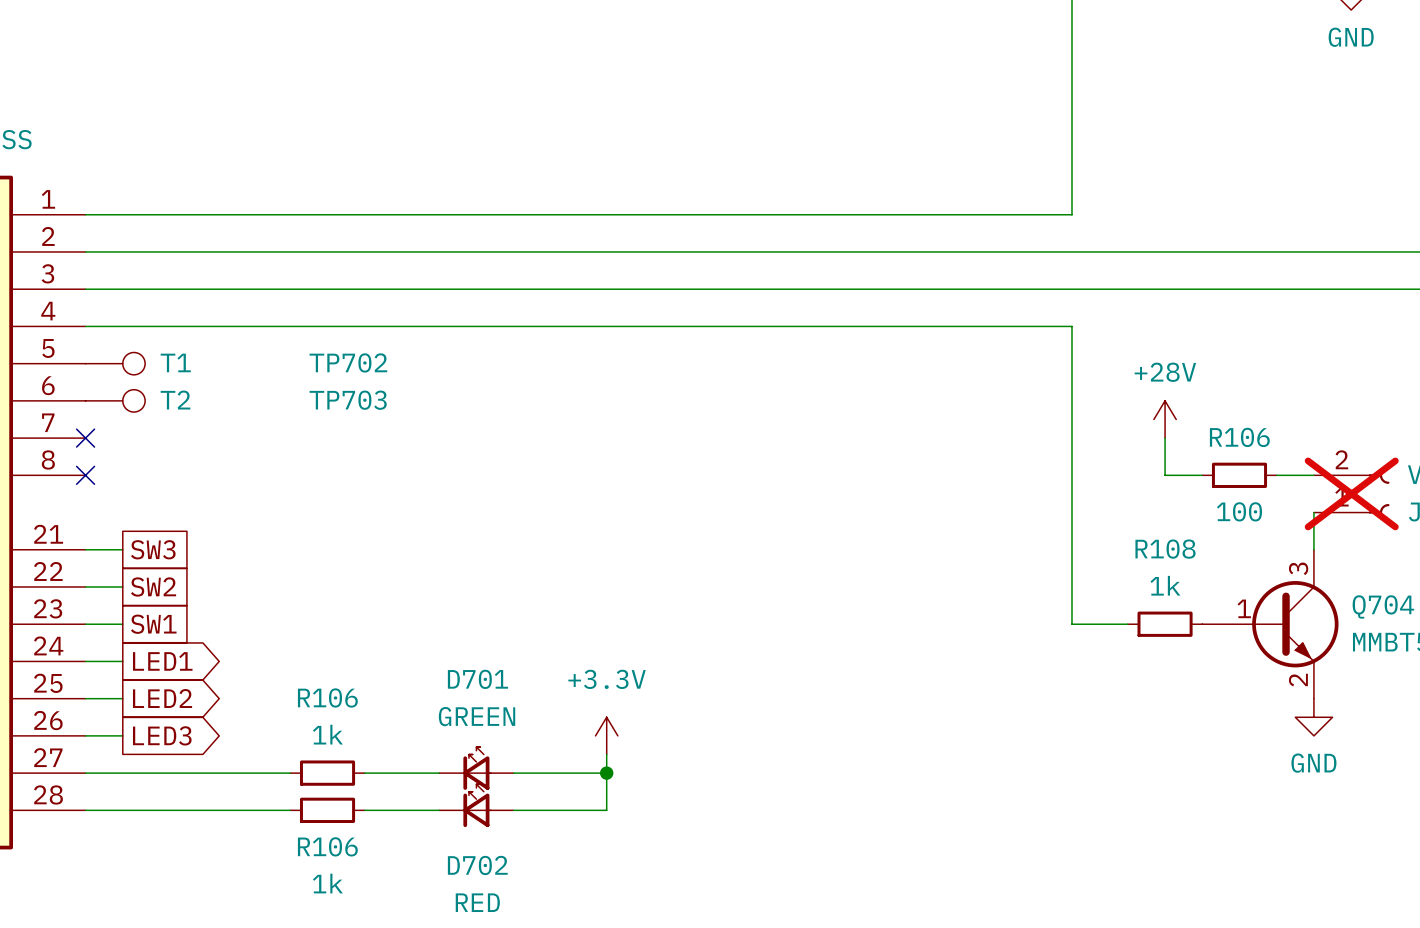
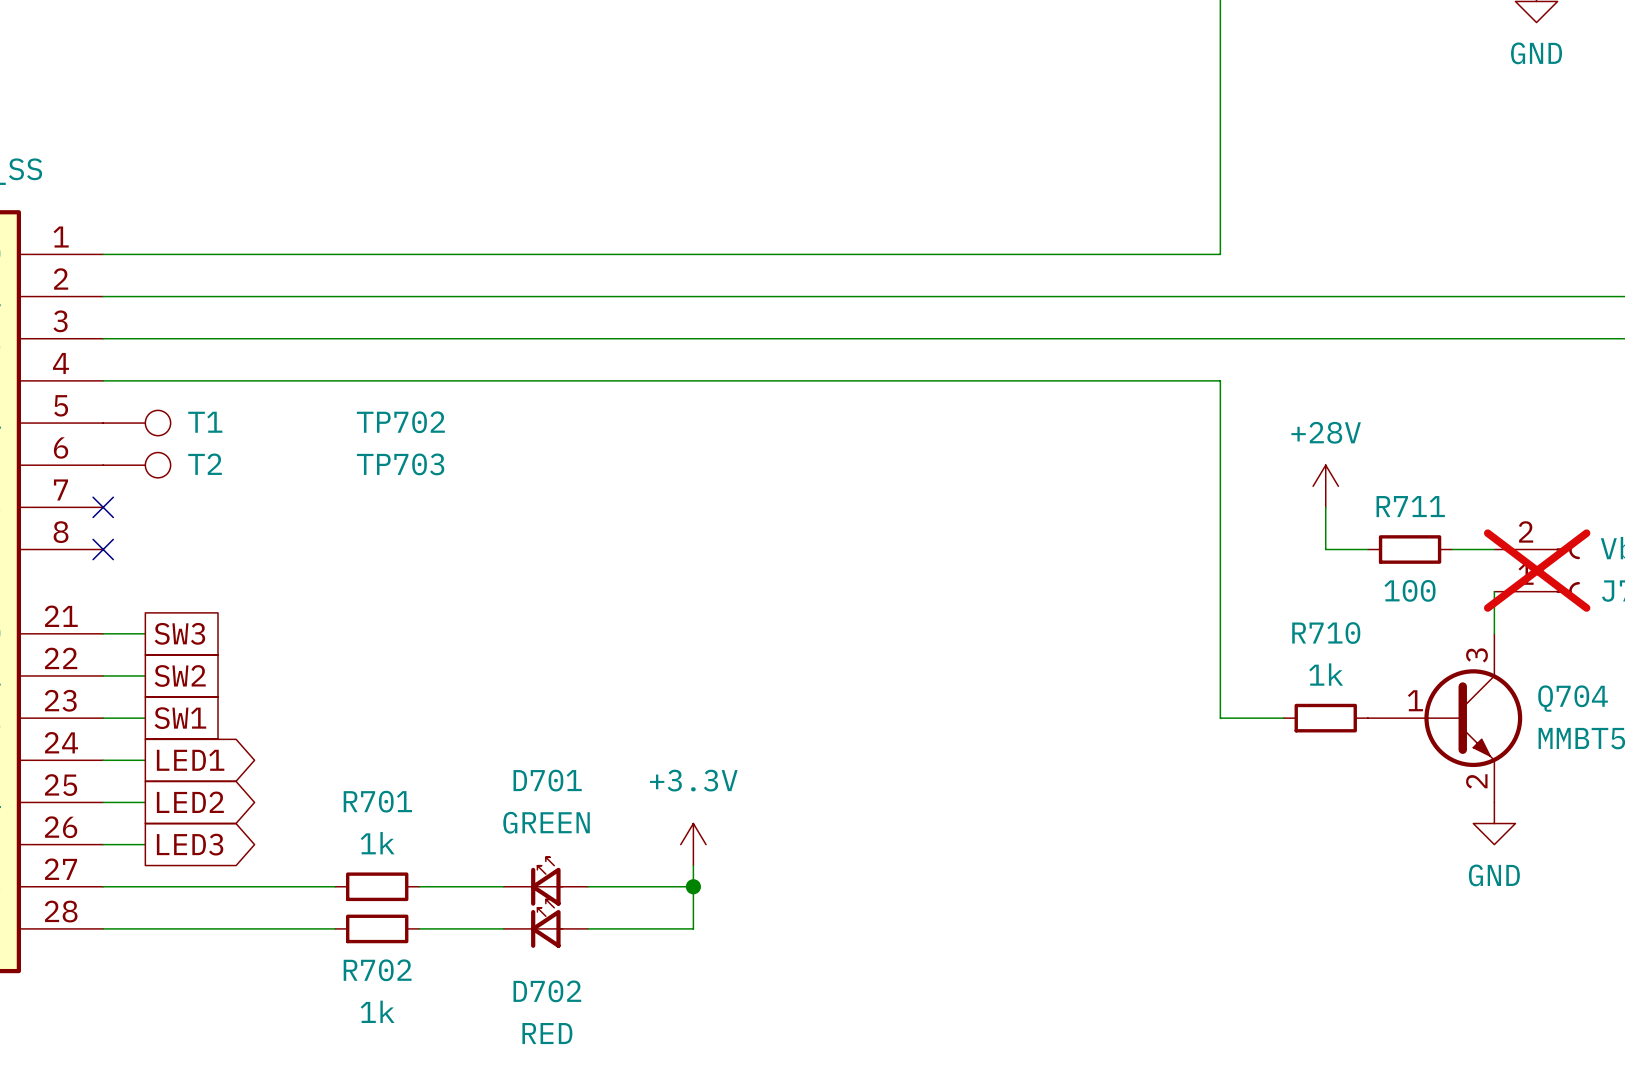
R106 name: R106 (1239, 437) -> R711 (1410, 506)
R108 name: R108 (1165, 549) -> R710 (1326, 633)
R106 name: R106 (327, 697) -> R701 (377, 801)
R106 name: R106 (327, 846) -> R702 (377, 970)

